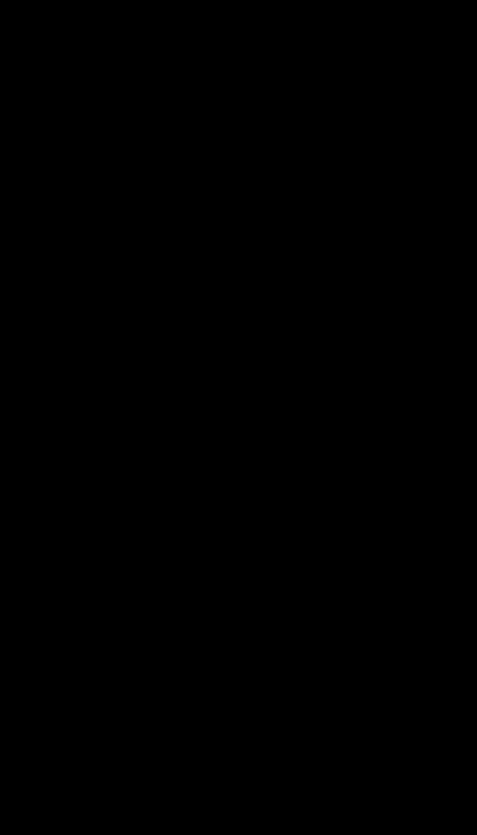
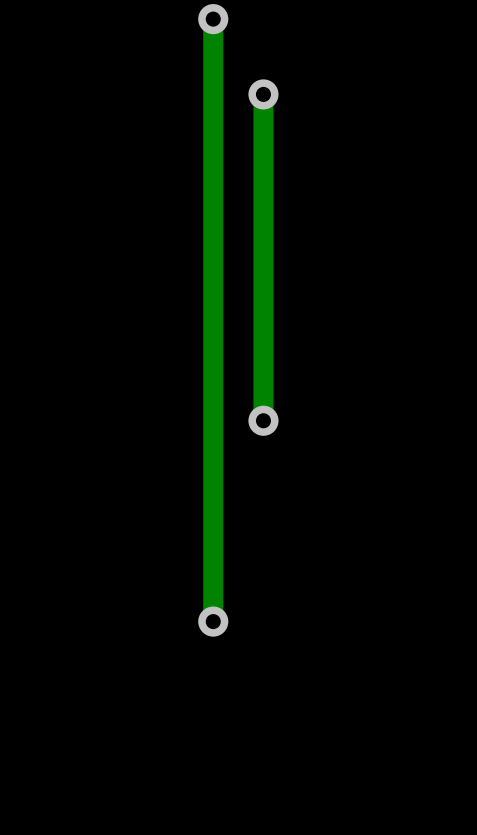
track: none -> (213, 19) (213, 621)
via: none -> (213, 19)
track: none -> (263, 94) (263, 420)
via: none -> (263, 94)
via: none -> (263, 420)
via: none -> (213, 621)

